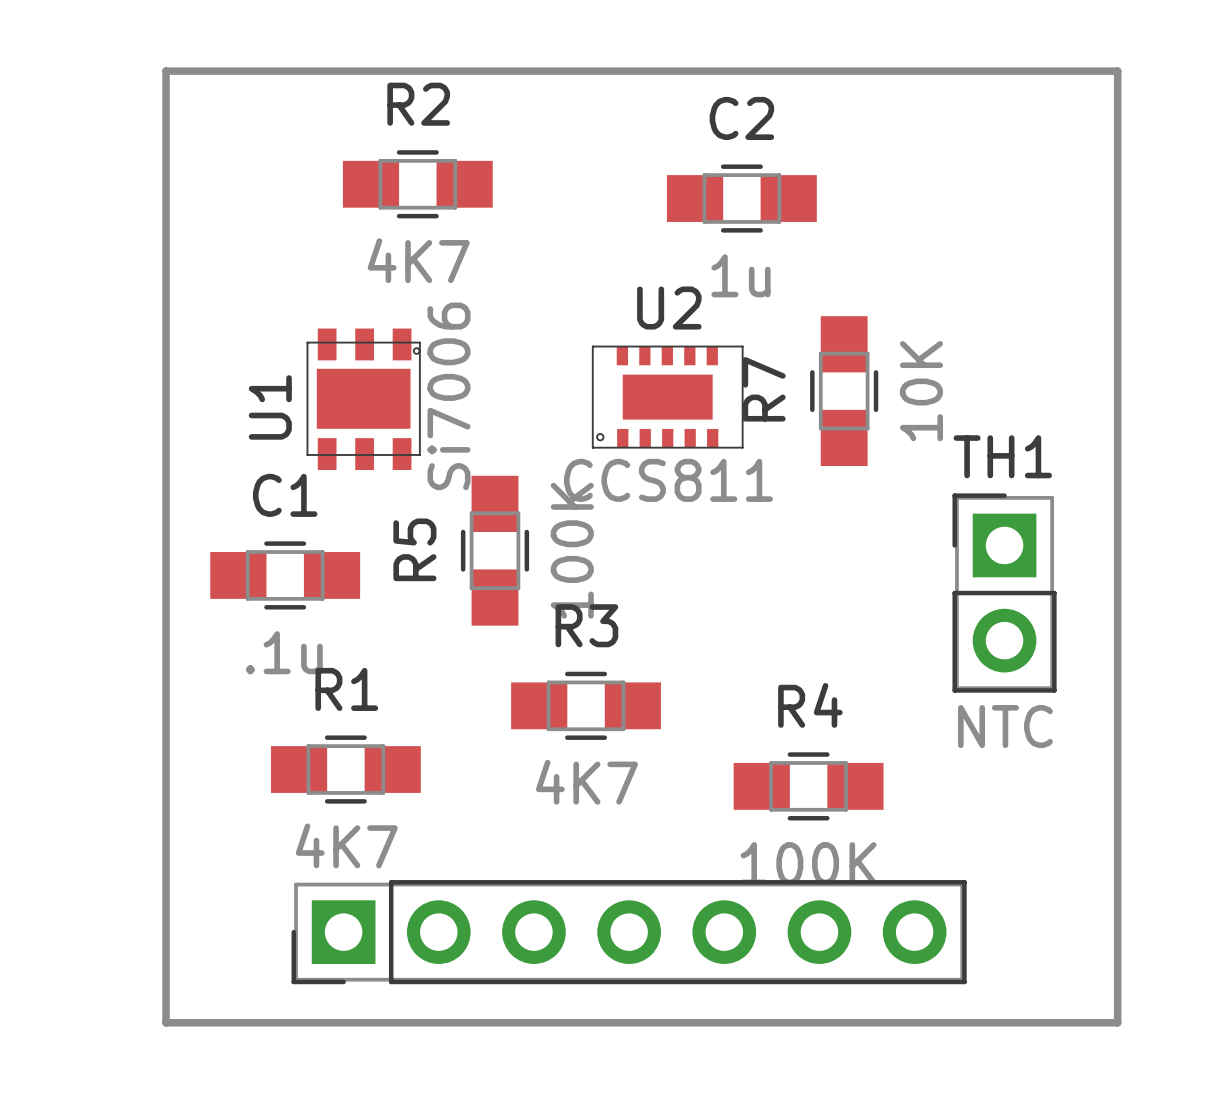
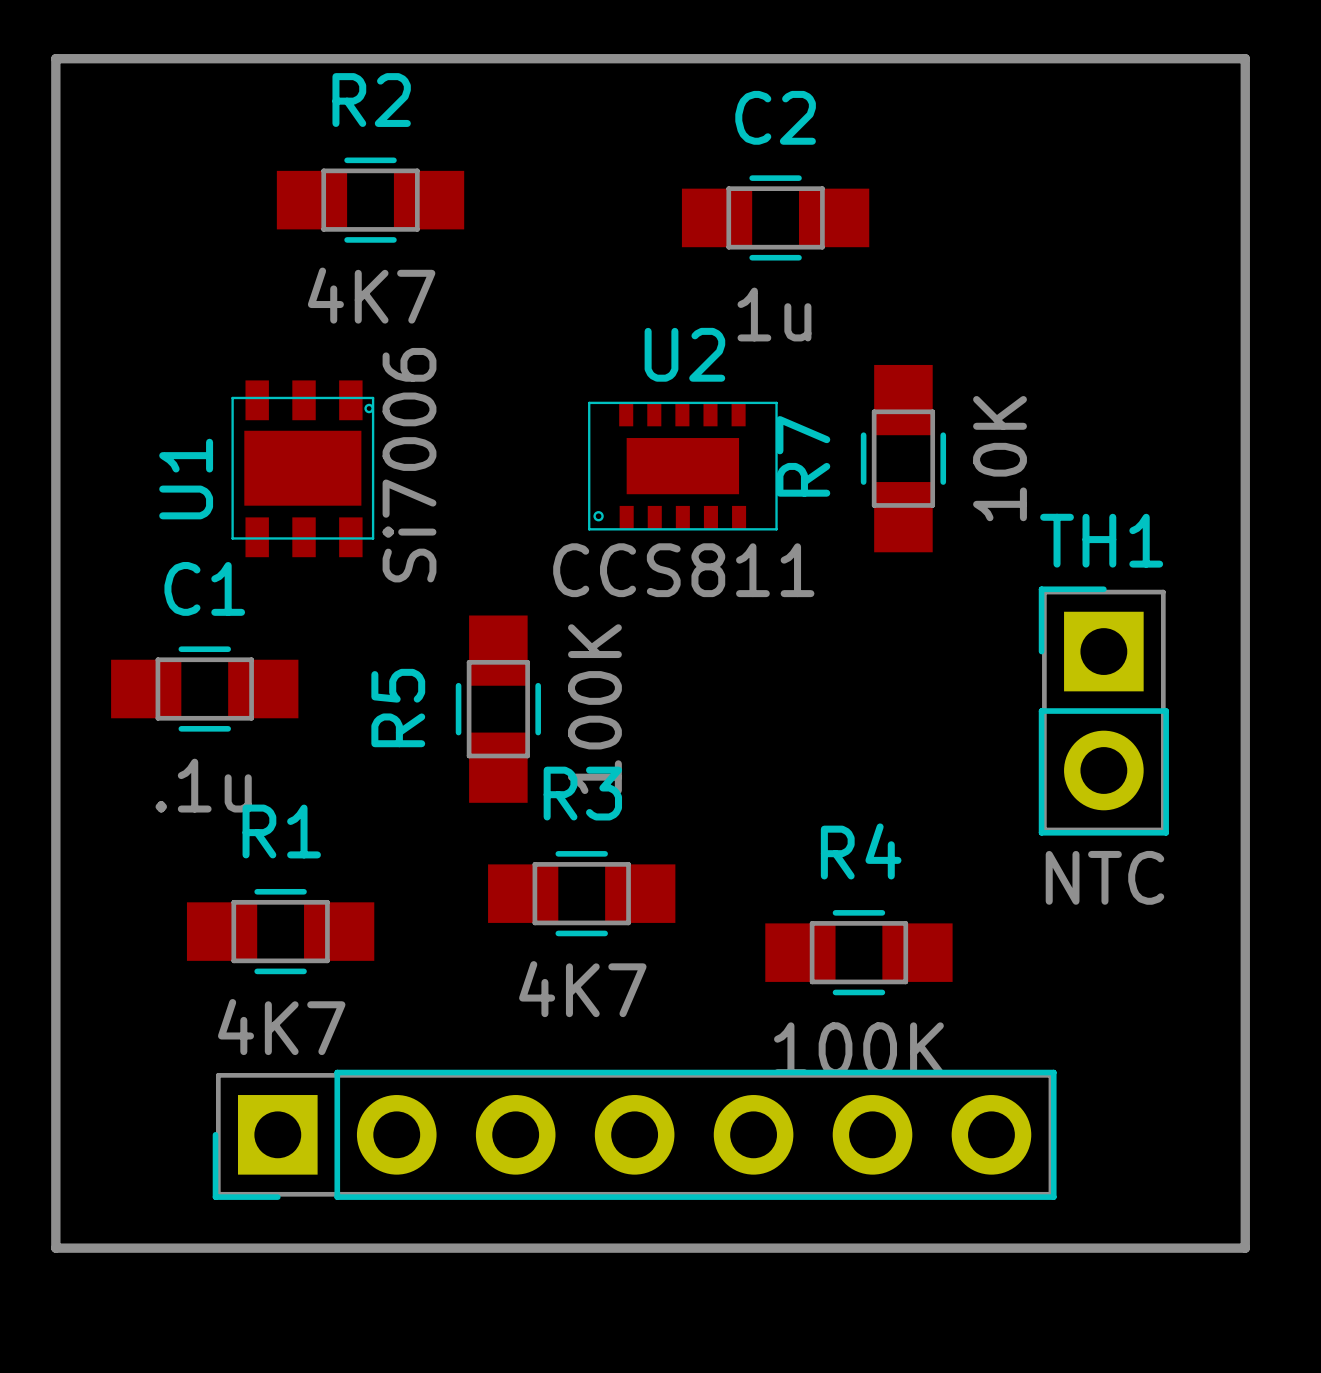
R5 position: (494, 550) -> (498, 709)
R3 position: (586, 705) -> (581, 893)

